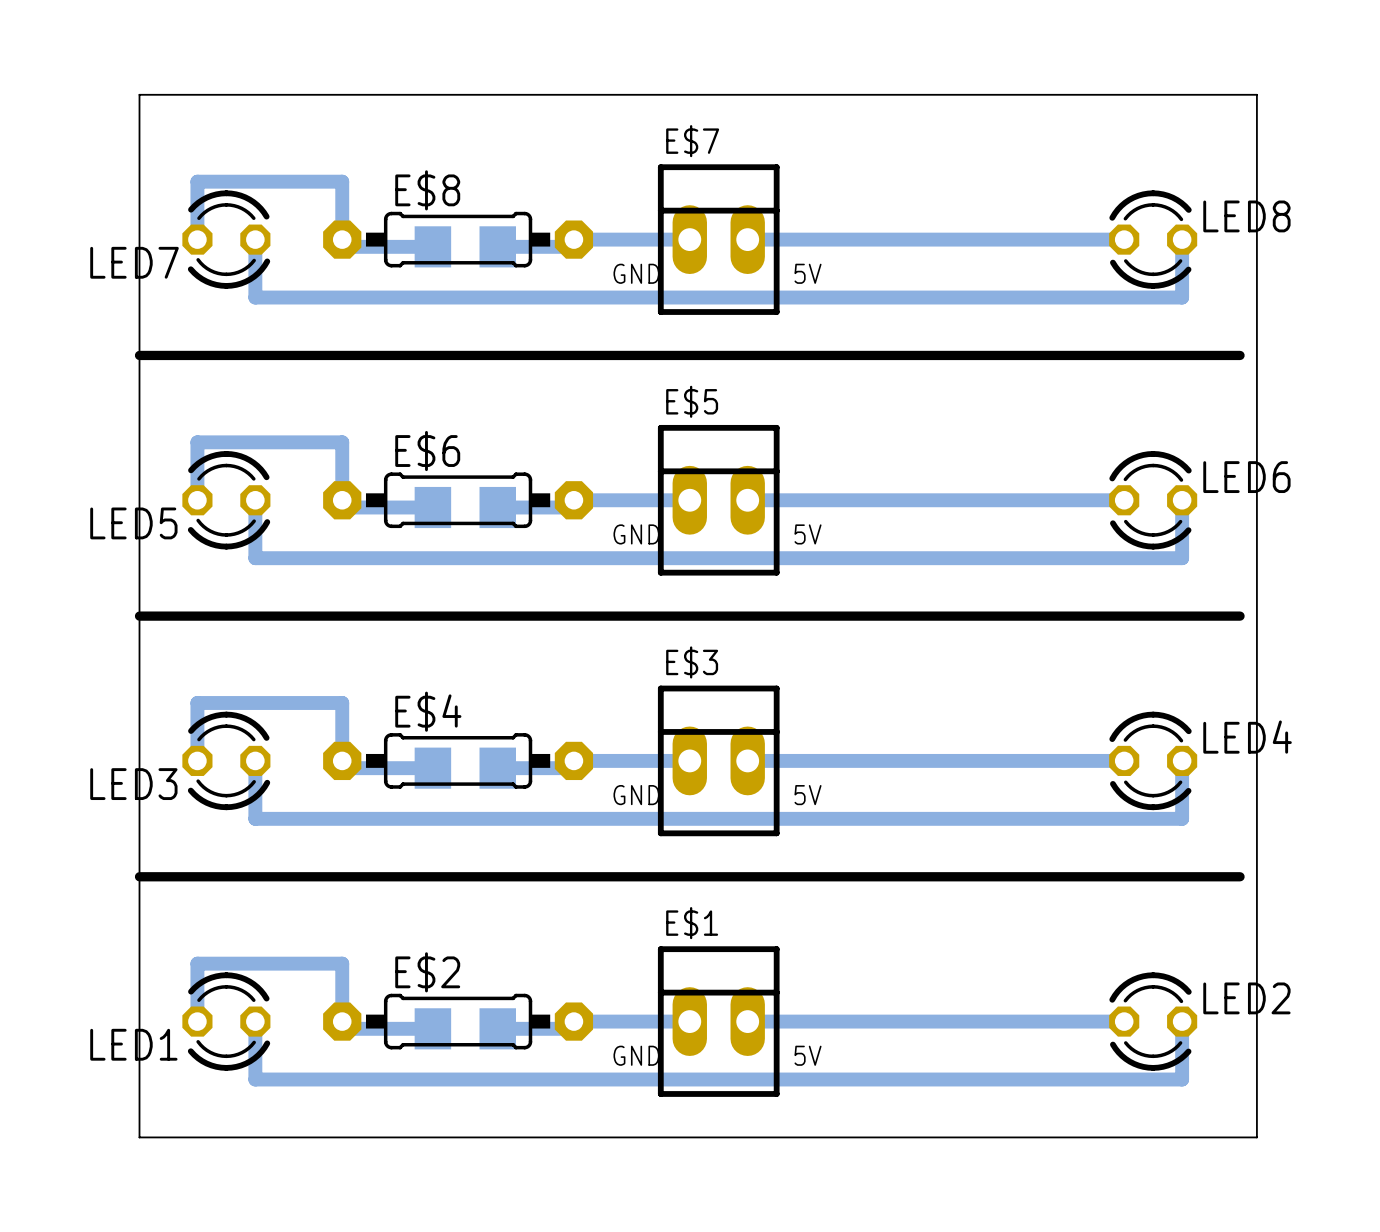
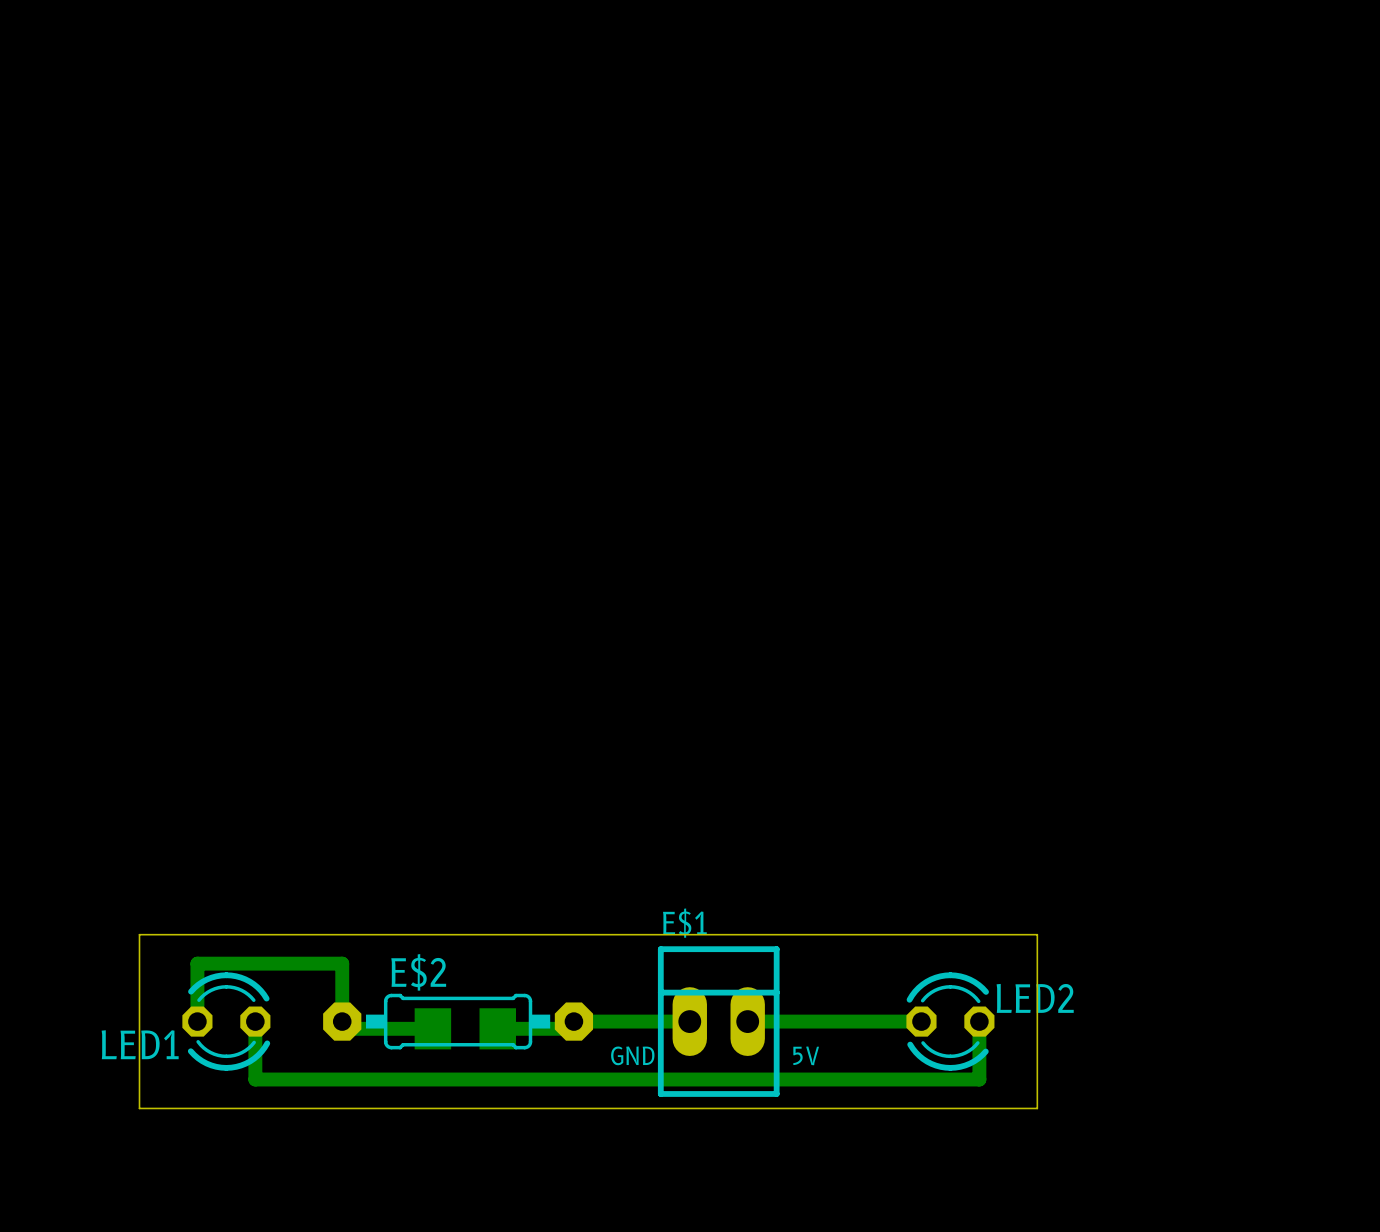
bottom track: (197, 239) (197, 181) (342, 181) (342, 246) (432, 246) -> none
LED7: (226, 239) -> none
bottom track: (255, 239) (255, 297) (1182, 297) (1182, 239) -> none
E$8: (458, 239) -> none
bottom track: (689, 239) (573, 239) (573, 246) (497, 246) -> none
E$7: (718, 239) -> none
bottom track: (747, 239) (1124, 239) -> none
LED8: (1153, 239) -> none
part: (465, 246) -> none
text: GND (636, 273) -> none
text: 5V (808, 273) -> none
line: (139, 355) (1240, 355) -> none
bottom track: (197, 500) (197, 442) (342, 442) (342, 507) (432, 507) -> none
LED5: (226, 500) -> none
bottom track: (255, 500) (255, 558) (1182, 558) (1182, 500) -> none
E$6: (458, 500) -> none
bottom track: (689, 500) (573, 500) (573, 507) (497, 507) -> none
E$5: (718, 500) -> none
bottom track: (747, 500) (1124, 500) -> none
LED6: (1153, 500) -> none
part: (465, 507) -> none
text: GND (636, 534) -> none
text: 5V (808, 534) -> none
line: (139, 616) (1240, 616) -> none
bottom track: (197, 760) (197, 703) (342, 703) (342, 768) (432, 768) -> none
LED3: (226, 760) -> none
bottom track: (255, 760) (255, 818) (1182, 818) (1182, 760) -> none
E$4: (458, 760) -> none
bottom track: (689, 760) (573, 760) (573, 768) (497, 768) -> none
E$3: (718, 760) -> none
bottom track: (747, 760) (1124, 760) -> none
LED4: (1153, 760) -> none
part: (465, 768) -> none
text: GND (636, 795) -> none
text: 5V (808, 795) -> none
line: (139, 876) (1240, 876) -> none
board edge: (139, 934) (139, 94) (1256, 94) (1256, 1137) (139, 1137) (139, 1108) -> (139, 934) (1037, 934) (1037, 1108) (139, 1108)
bottom track: (921, 1021) (1124, 1021) -> none
LED2 position: (1153, 1021) -> (950, 1021)
bottom track: (1182, 1021) (1182, 1079) (979, 1079) -> (979, 1021) (979, 1079)

